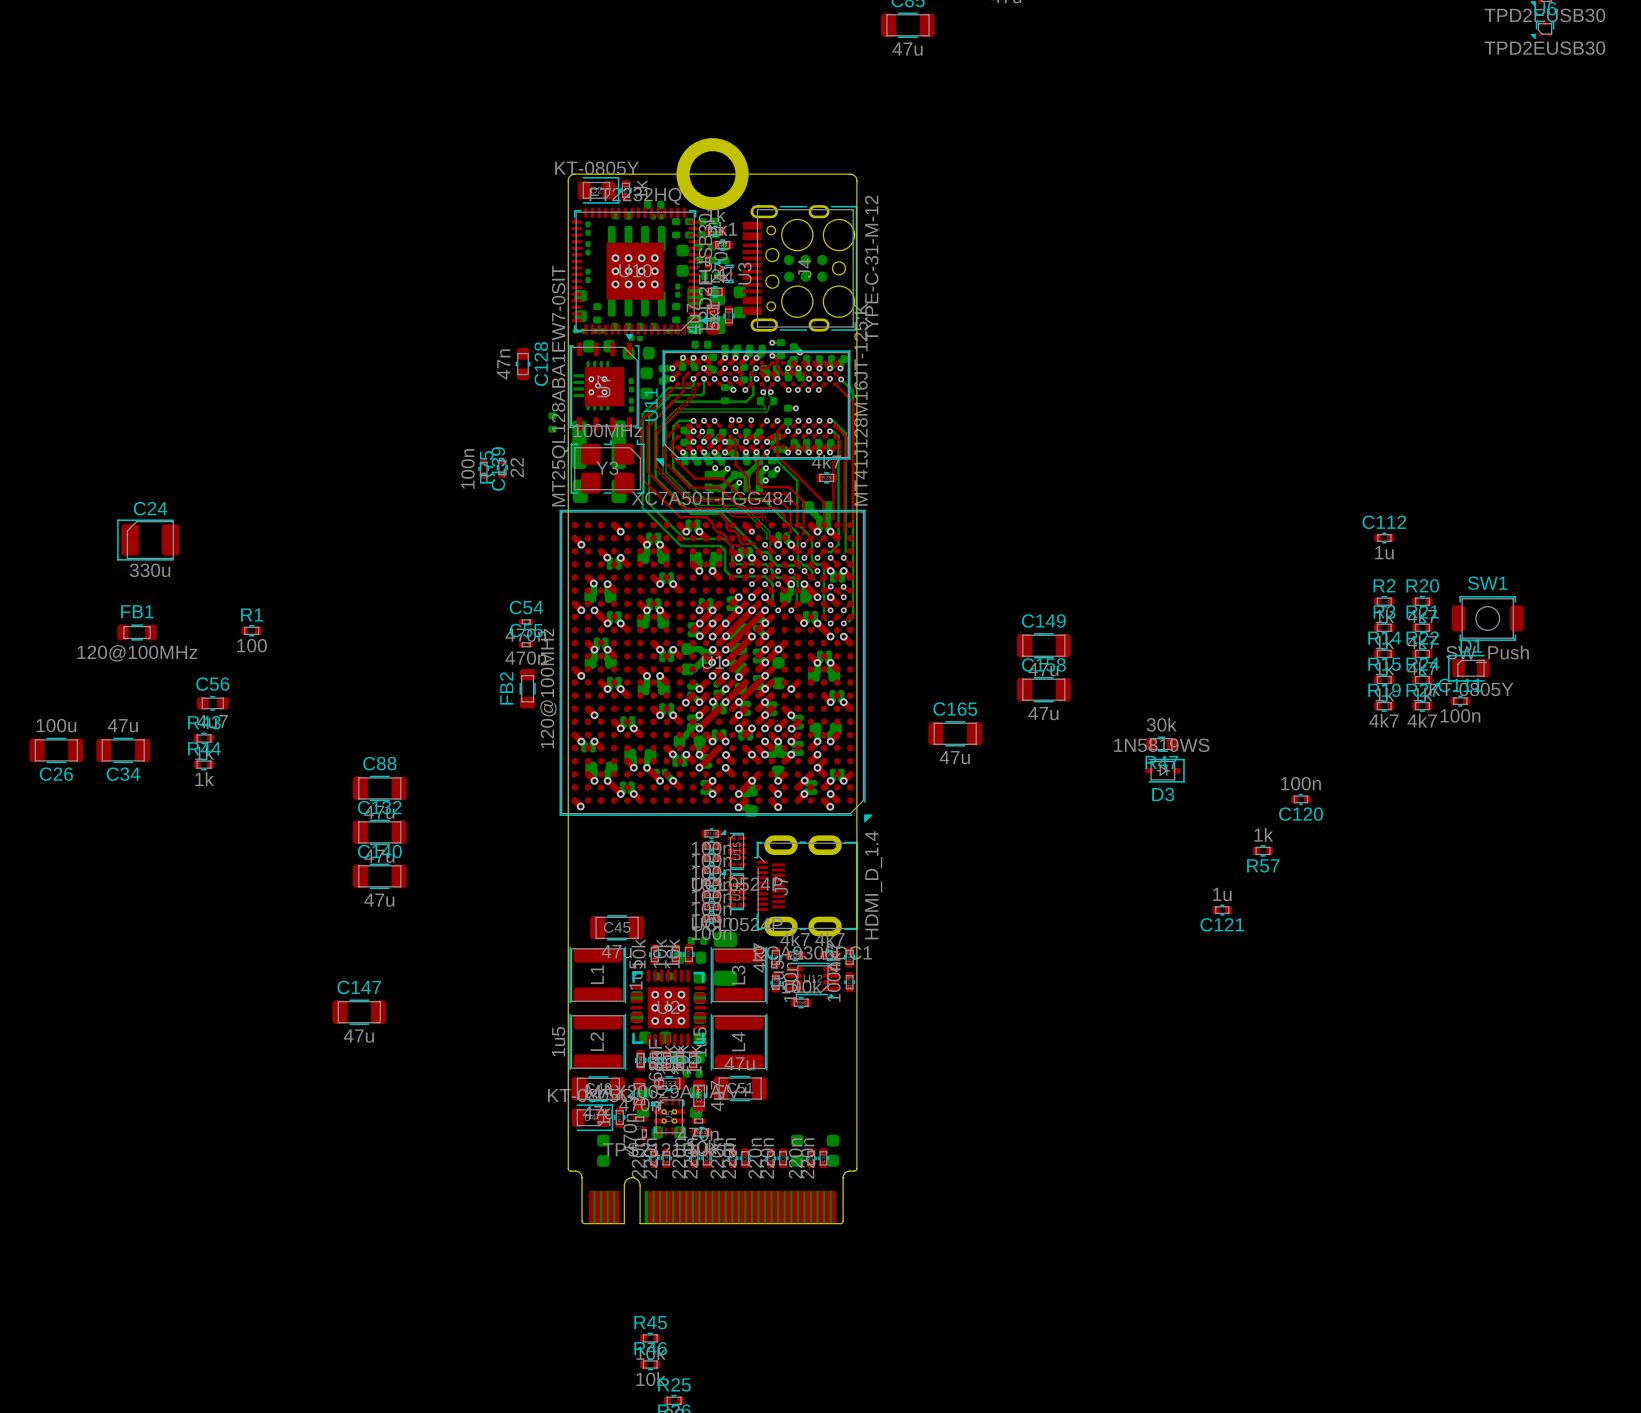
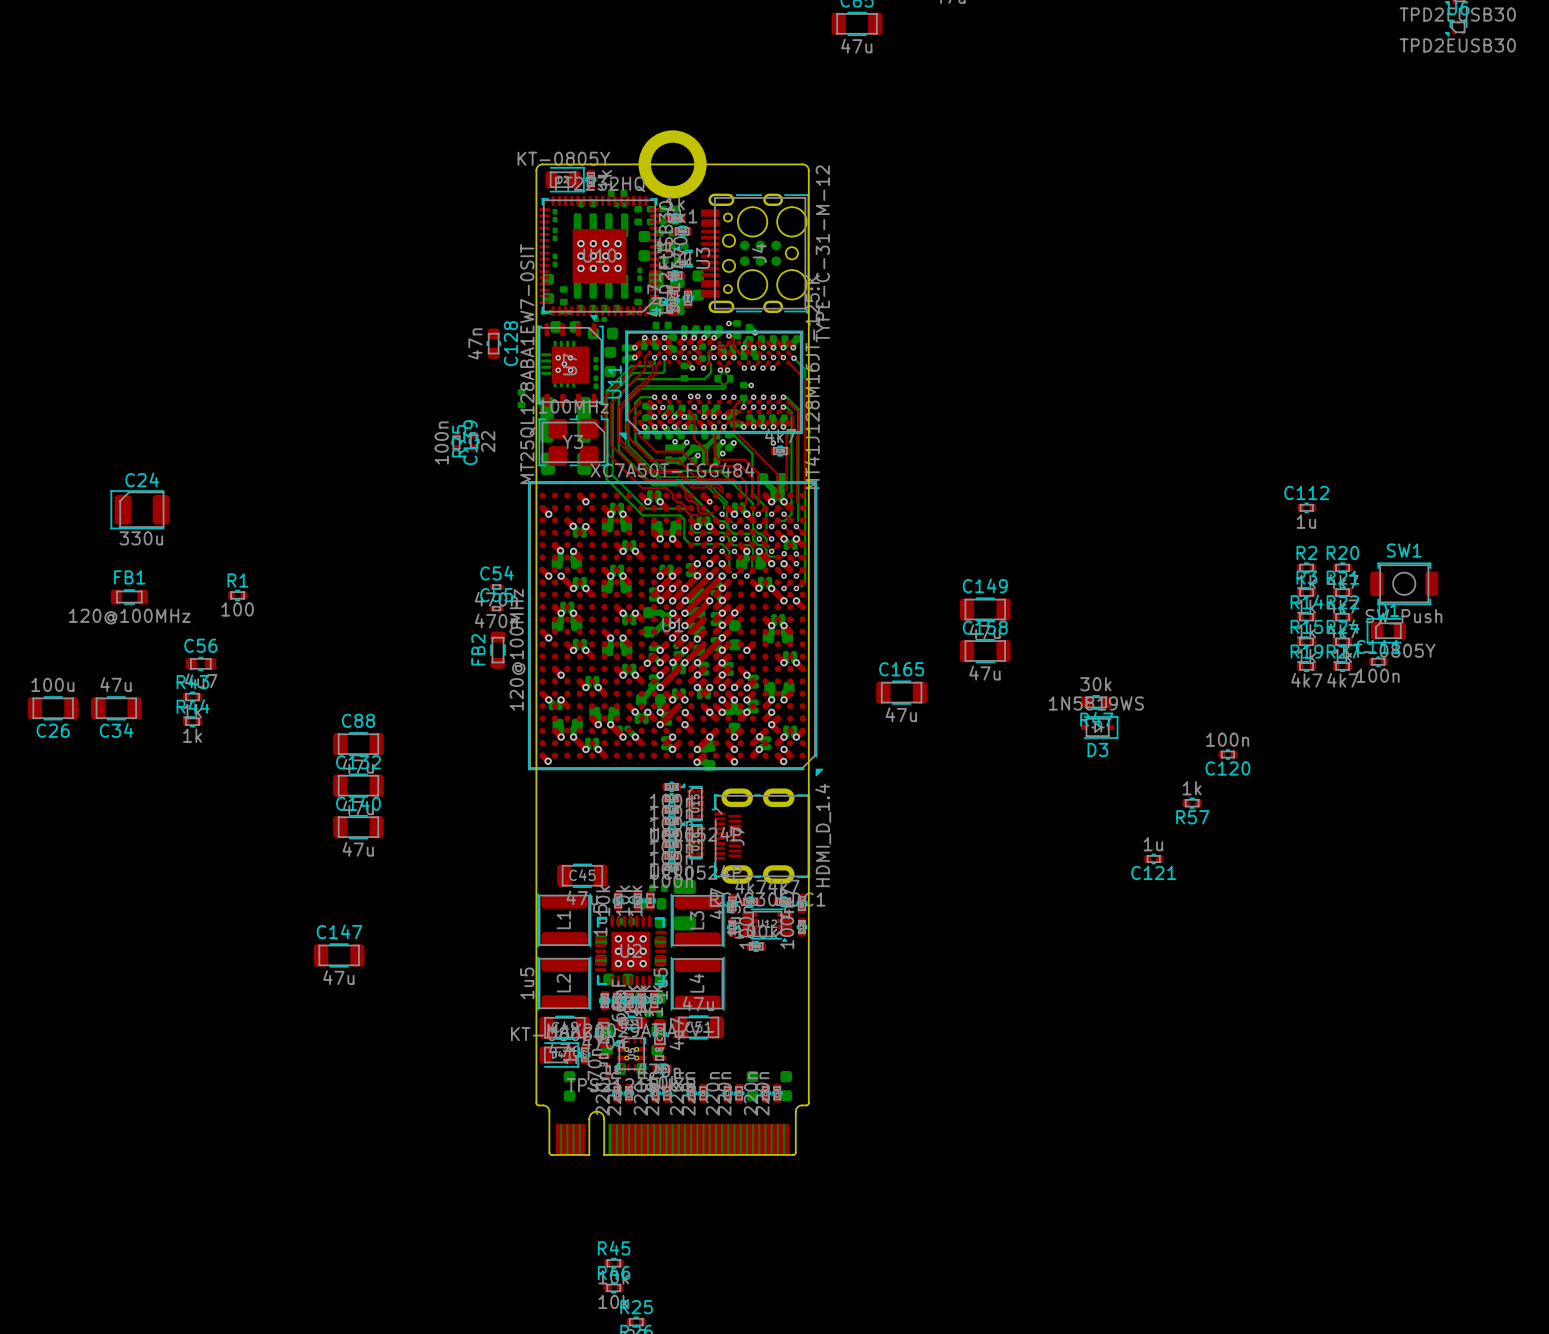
via: none -> (773, 443)
bottom track: none -> (753, 528) (753, 540) (758, 545) (761, 545) (769, 556) (779, 556)
bottom track: (812, 560) (816, 564) (824, 566) (824, 618) (826, 620) -> none

